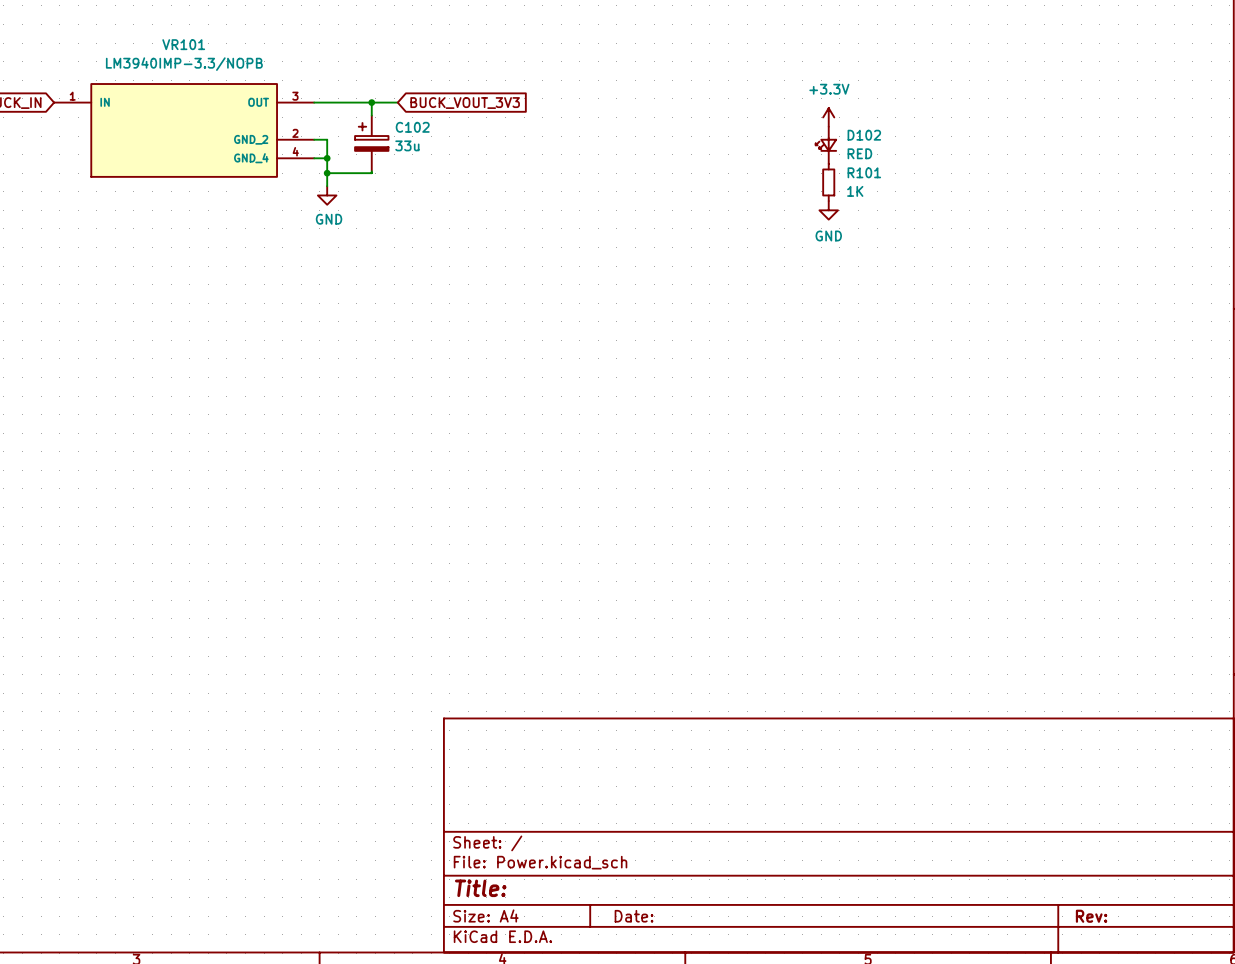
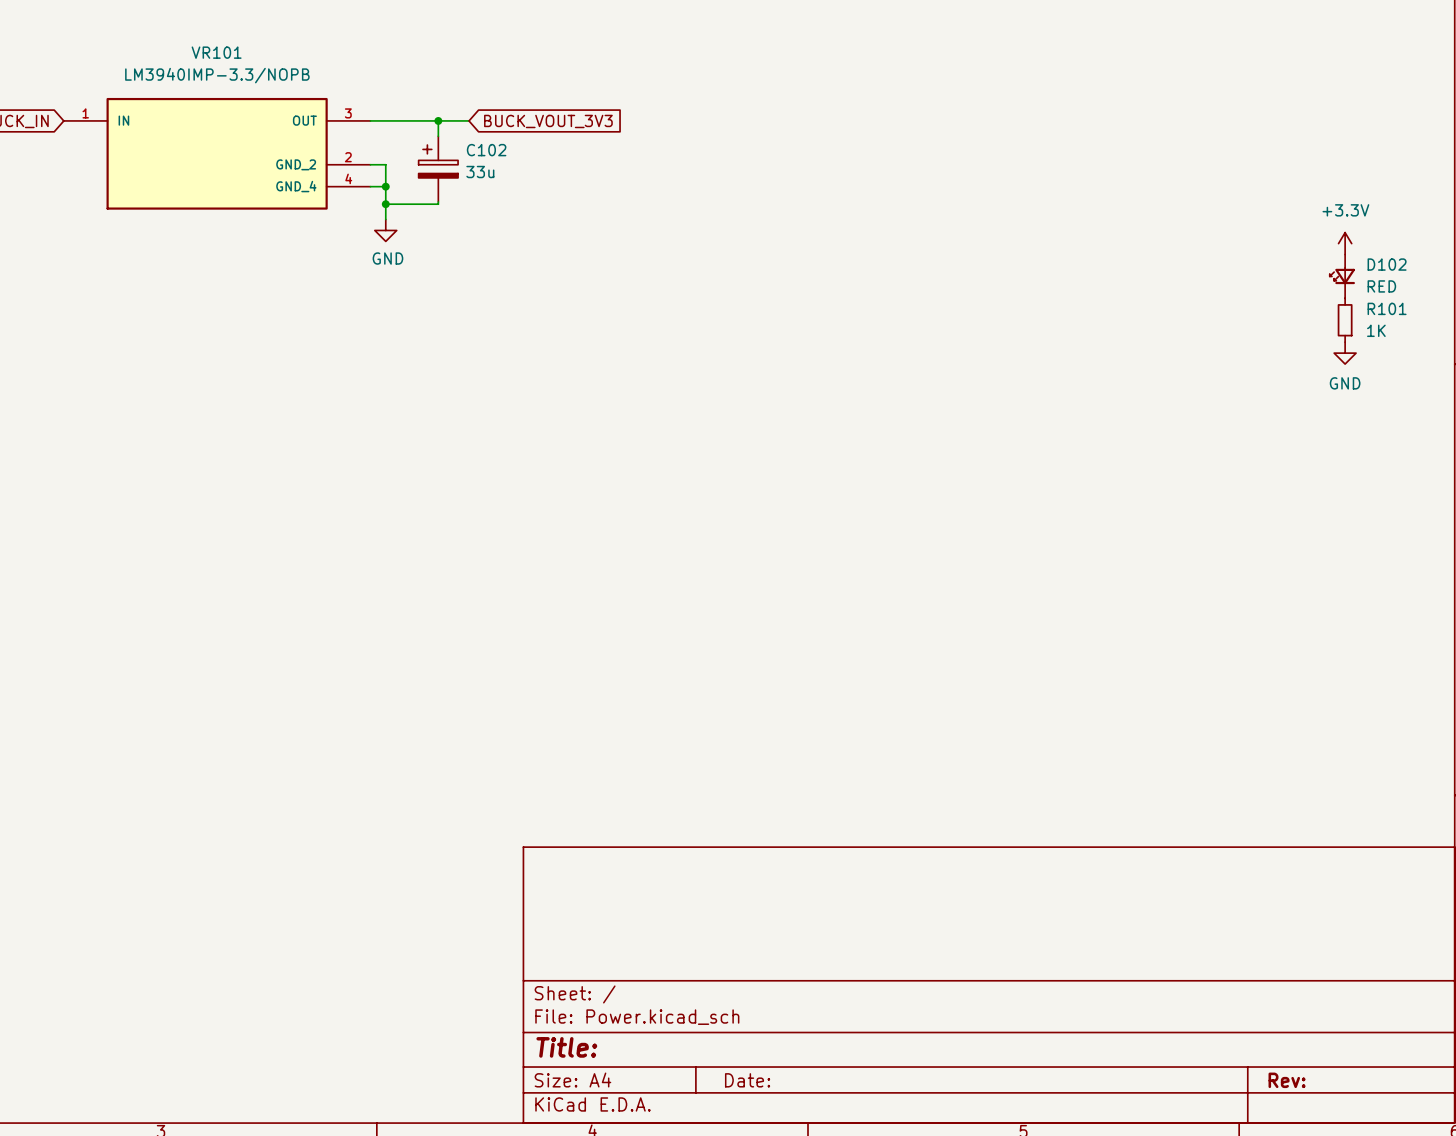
power symbol: +3.3V (828, 117) -> none
D102 position: (826, 145) -> (1342, 276)
R101 position: (828, 182) -> (1345, 320)
power symbol: none -> +3.3V (1345, 243)
power symbol: GND (828, 210) -> none
power symbol: none -> GND (1345, 353)

